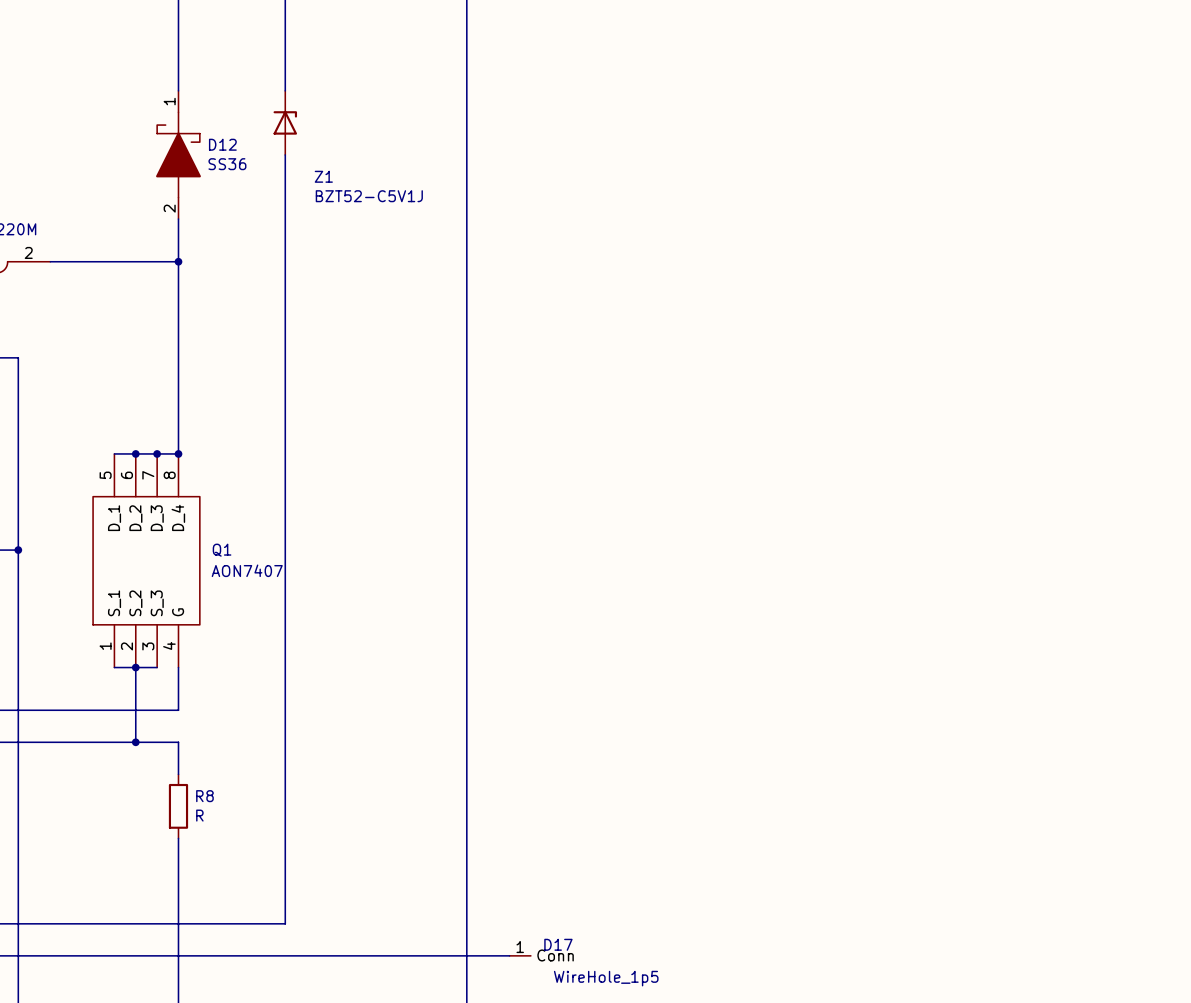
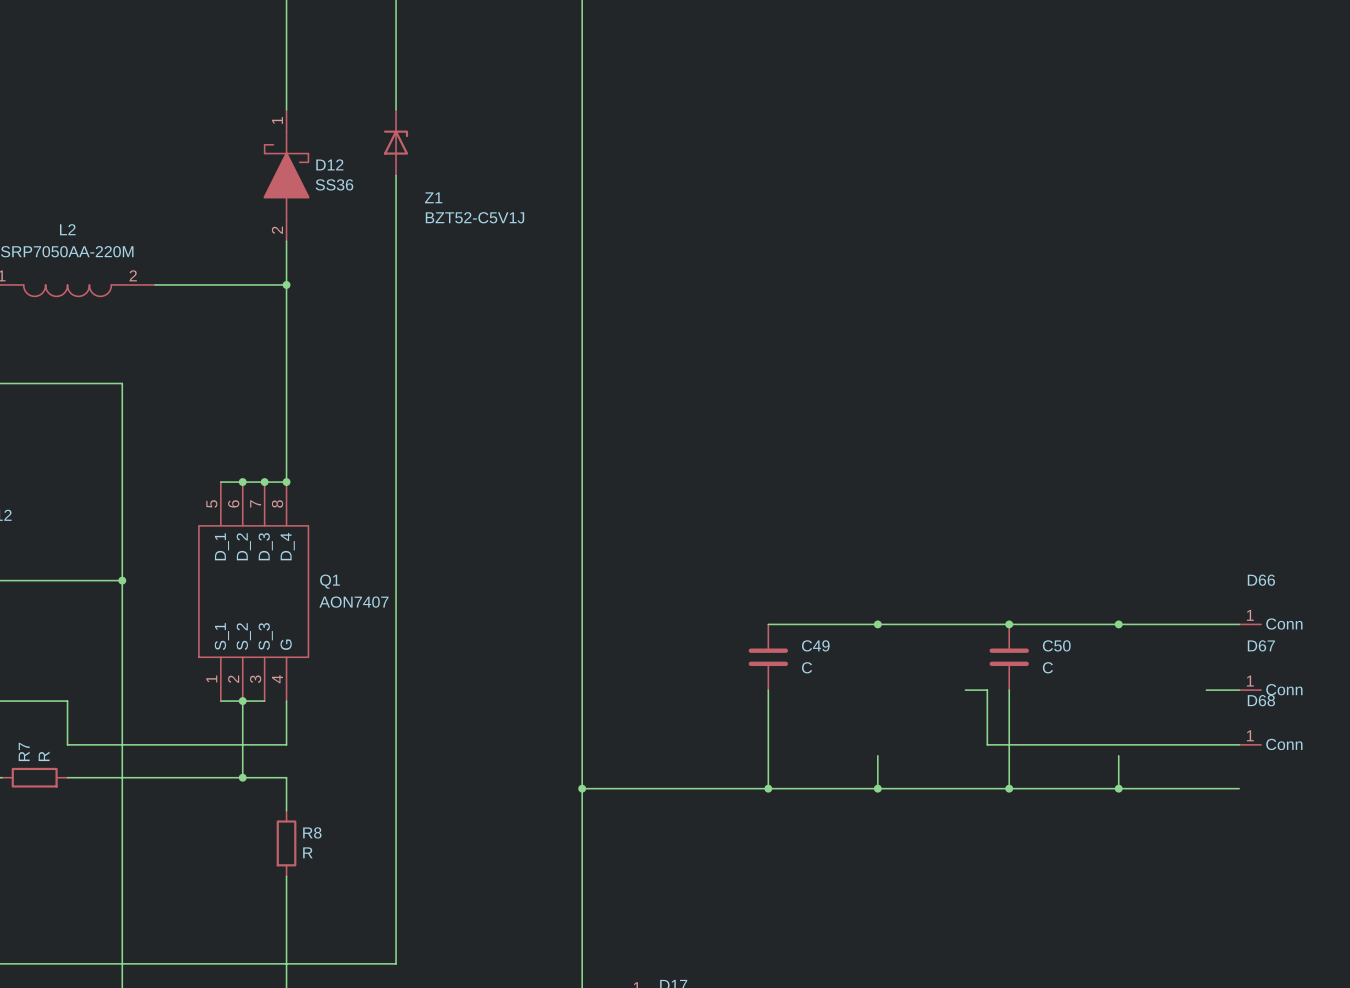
wire: none -> (768, 624) (1239, 624)
junction: none -> (877, 624)
junction: none -> (1009, 624)
junction: none -> (1118, 624)
D66: none -> (1250, 624)
C49: none -> C (768, 657)
C50: none -> C (1009, 657)
wire: none -> (768, 690) (768, 788)
wire: none -> (965, 690) (987, 690) (987, 744) (1239, 744)
wire: none -> (1009, 690) (1009, 788)
wire: none -> (1206, 690) (1239, 690)
D67: none -> (1250, 690)
D68: none -> (1250, 744)
wire: none -> (877, 755) (877, 788)
wire: none -> (1118, 755) (1118, 788)
wire: none -> (582, 788) (1239, 788)
junction: none -> (582, 788)
junction: none -> (768, 788)
junction: none -> (877, 788)
junction: none -> (1009, 788)
junction: none -> (1118, 788)

